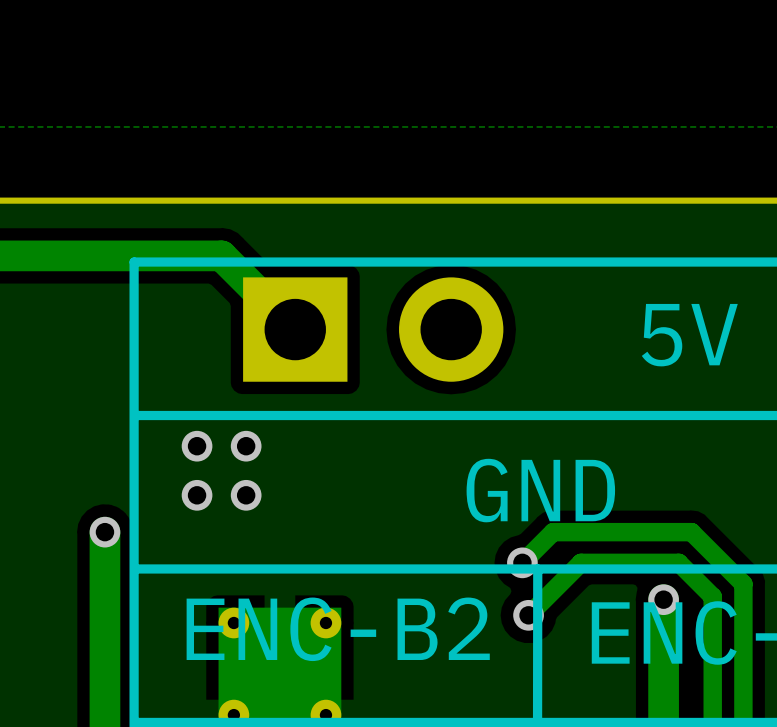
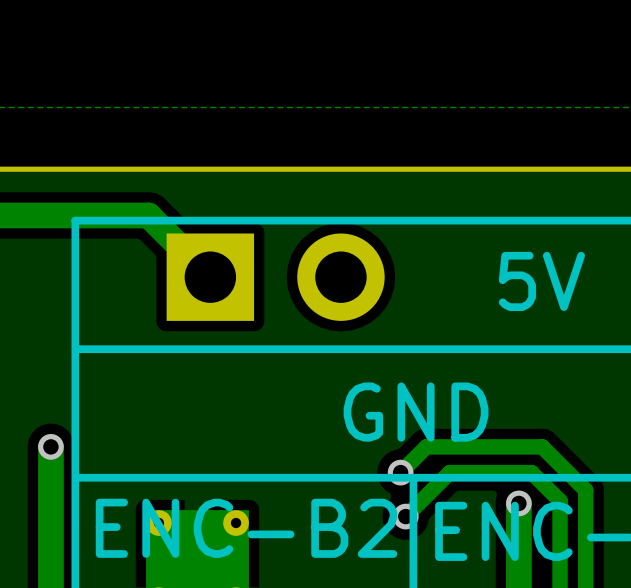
via: (197, 446) -> none
via: (246, 446) -> none
via: (197, 495) -> none
via: (246, 495) -> none

